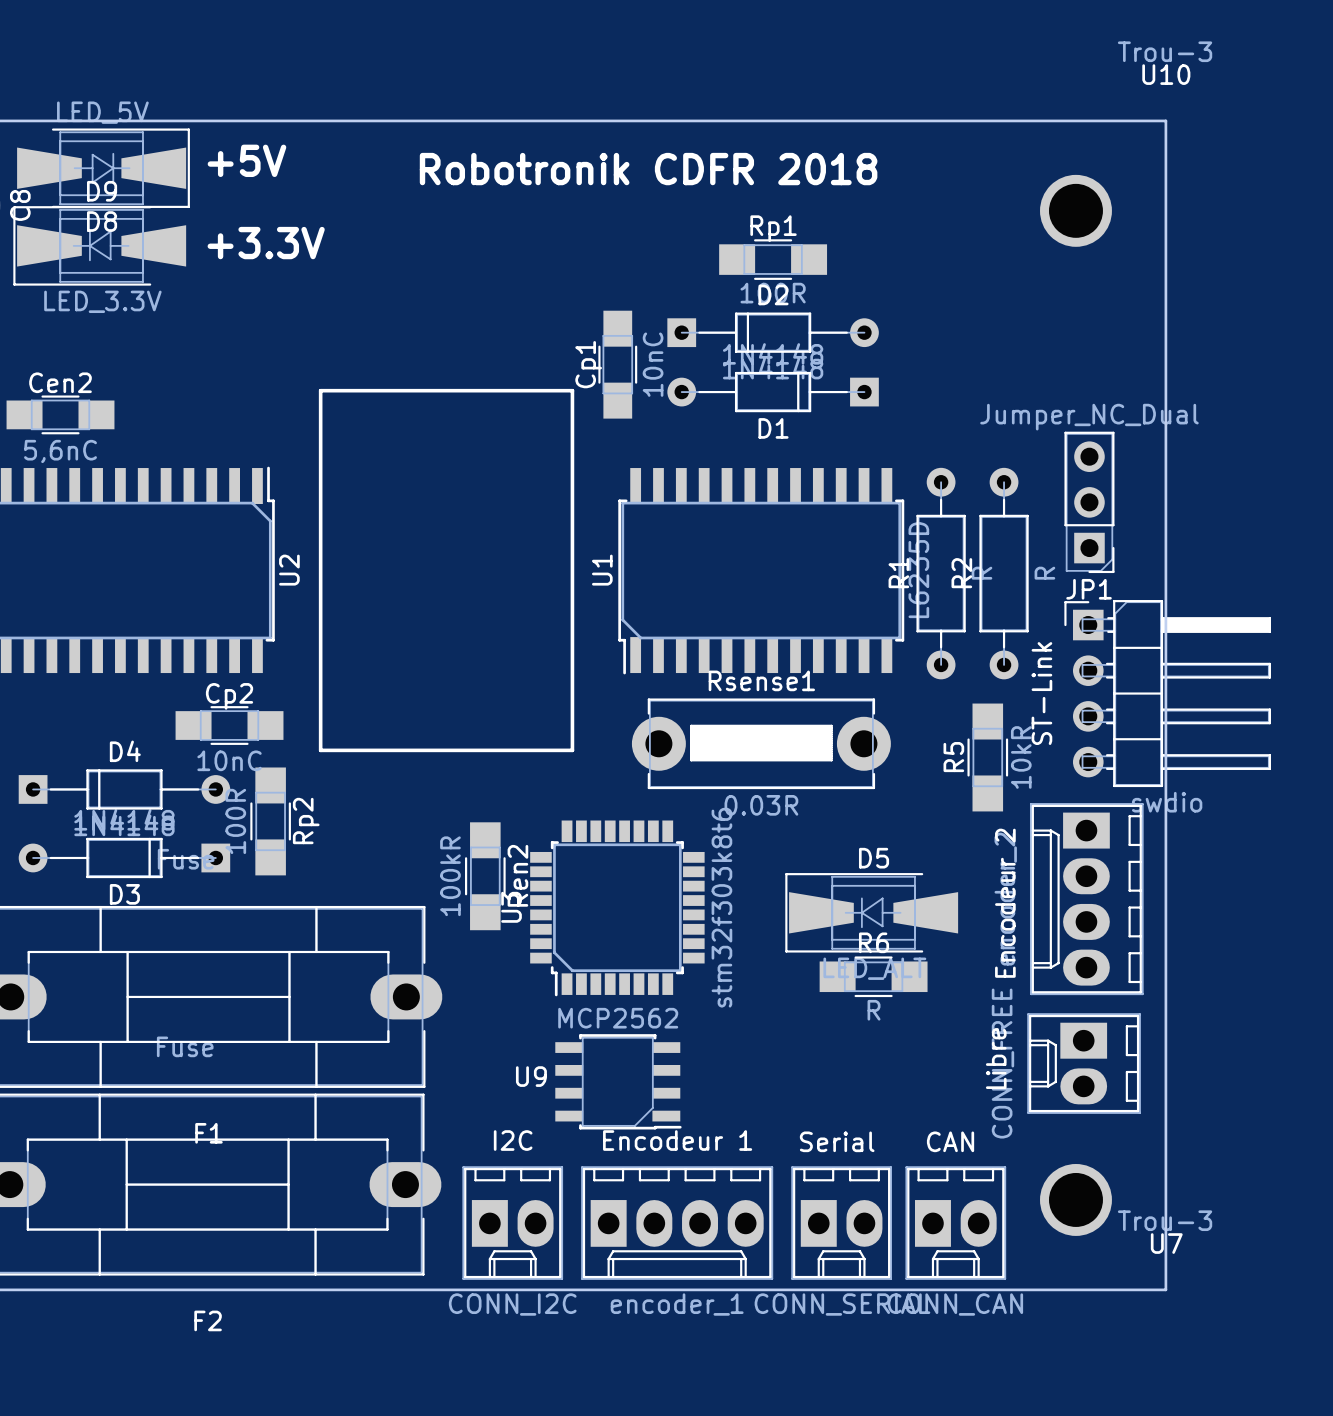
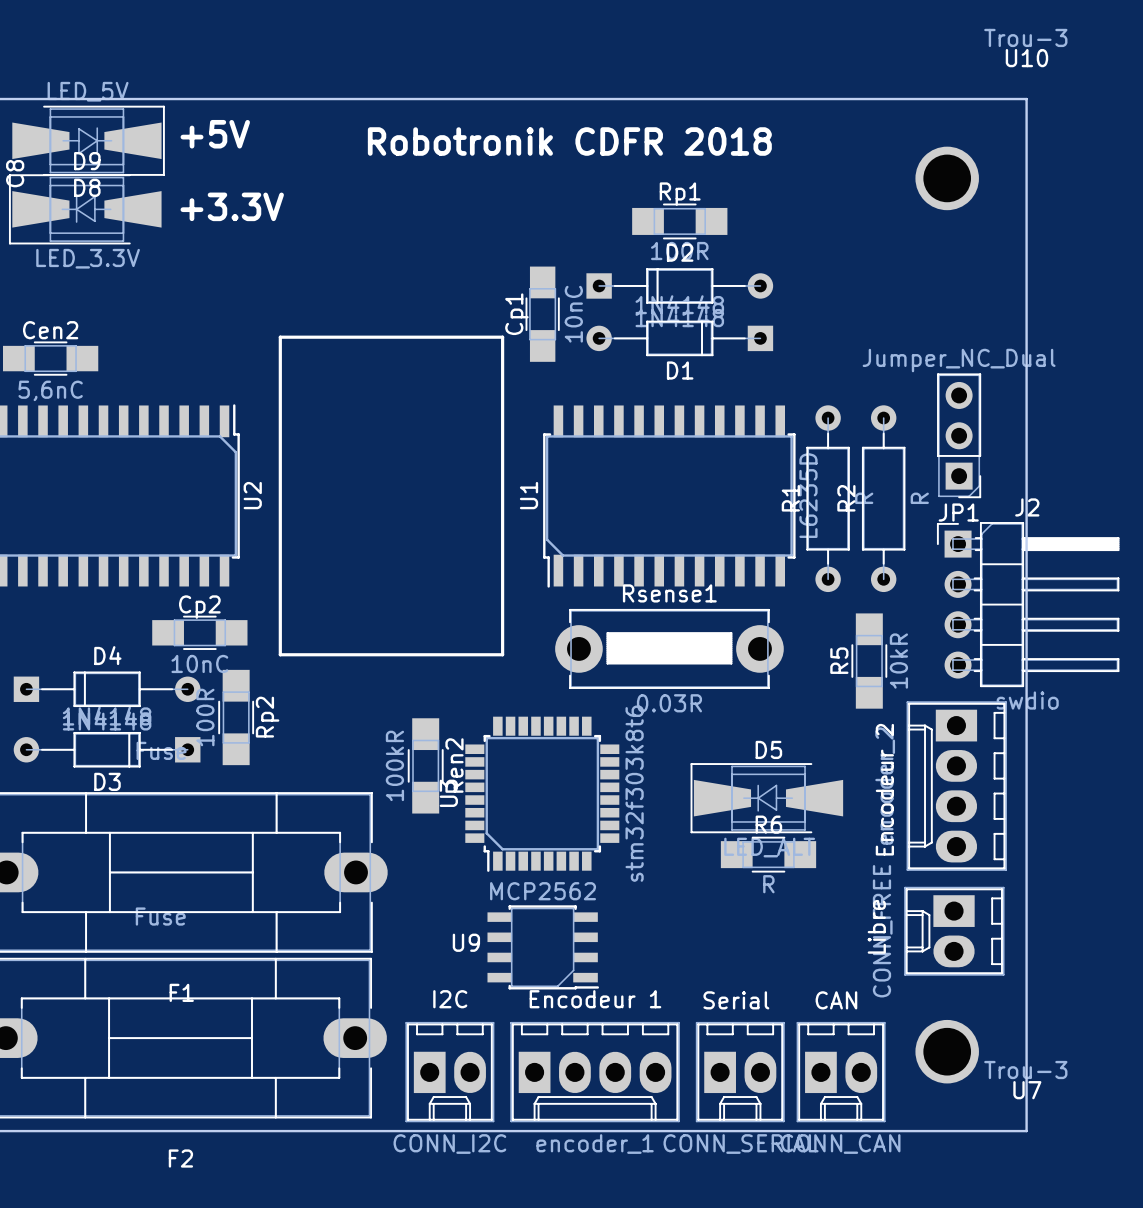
ST-Link name: ST-Link (1041, 693) -> J2 (1027, 507)

